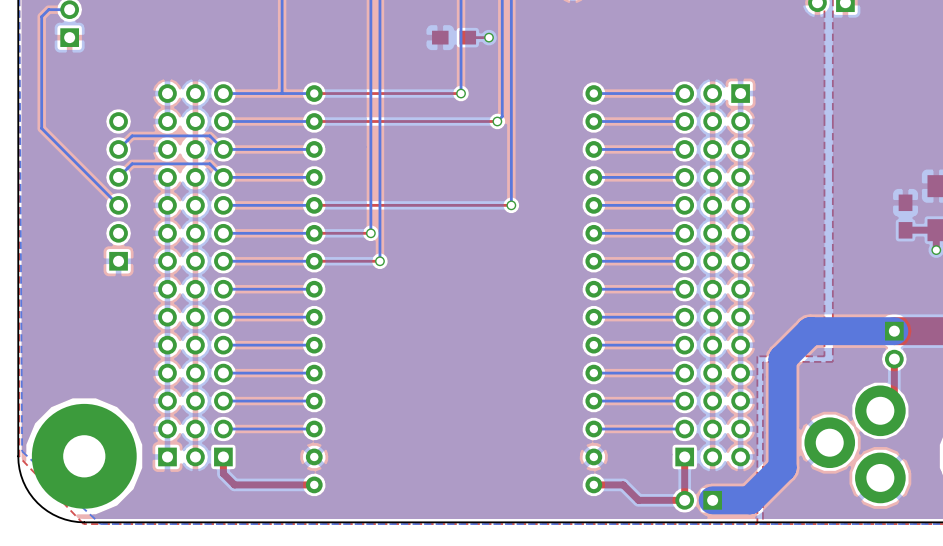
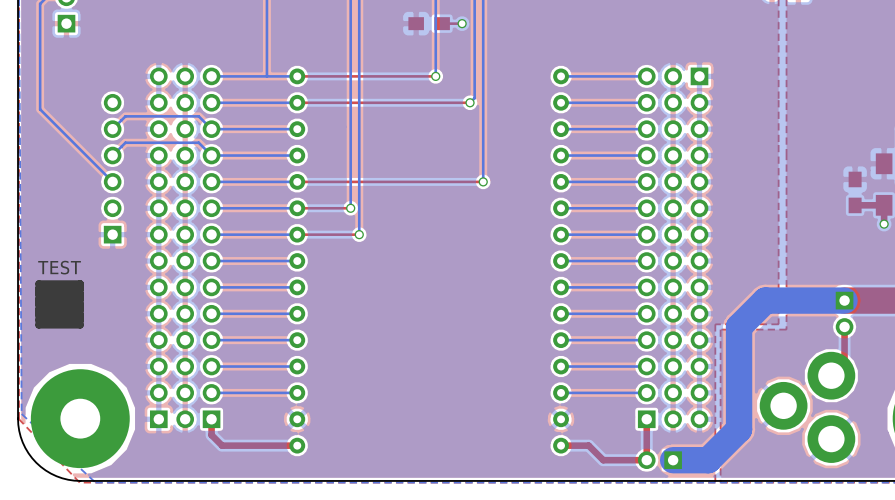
TEST: none -> (59, 304)

